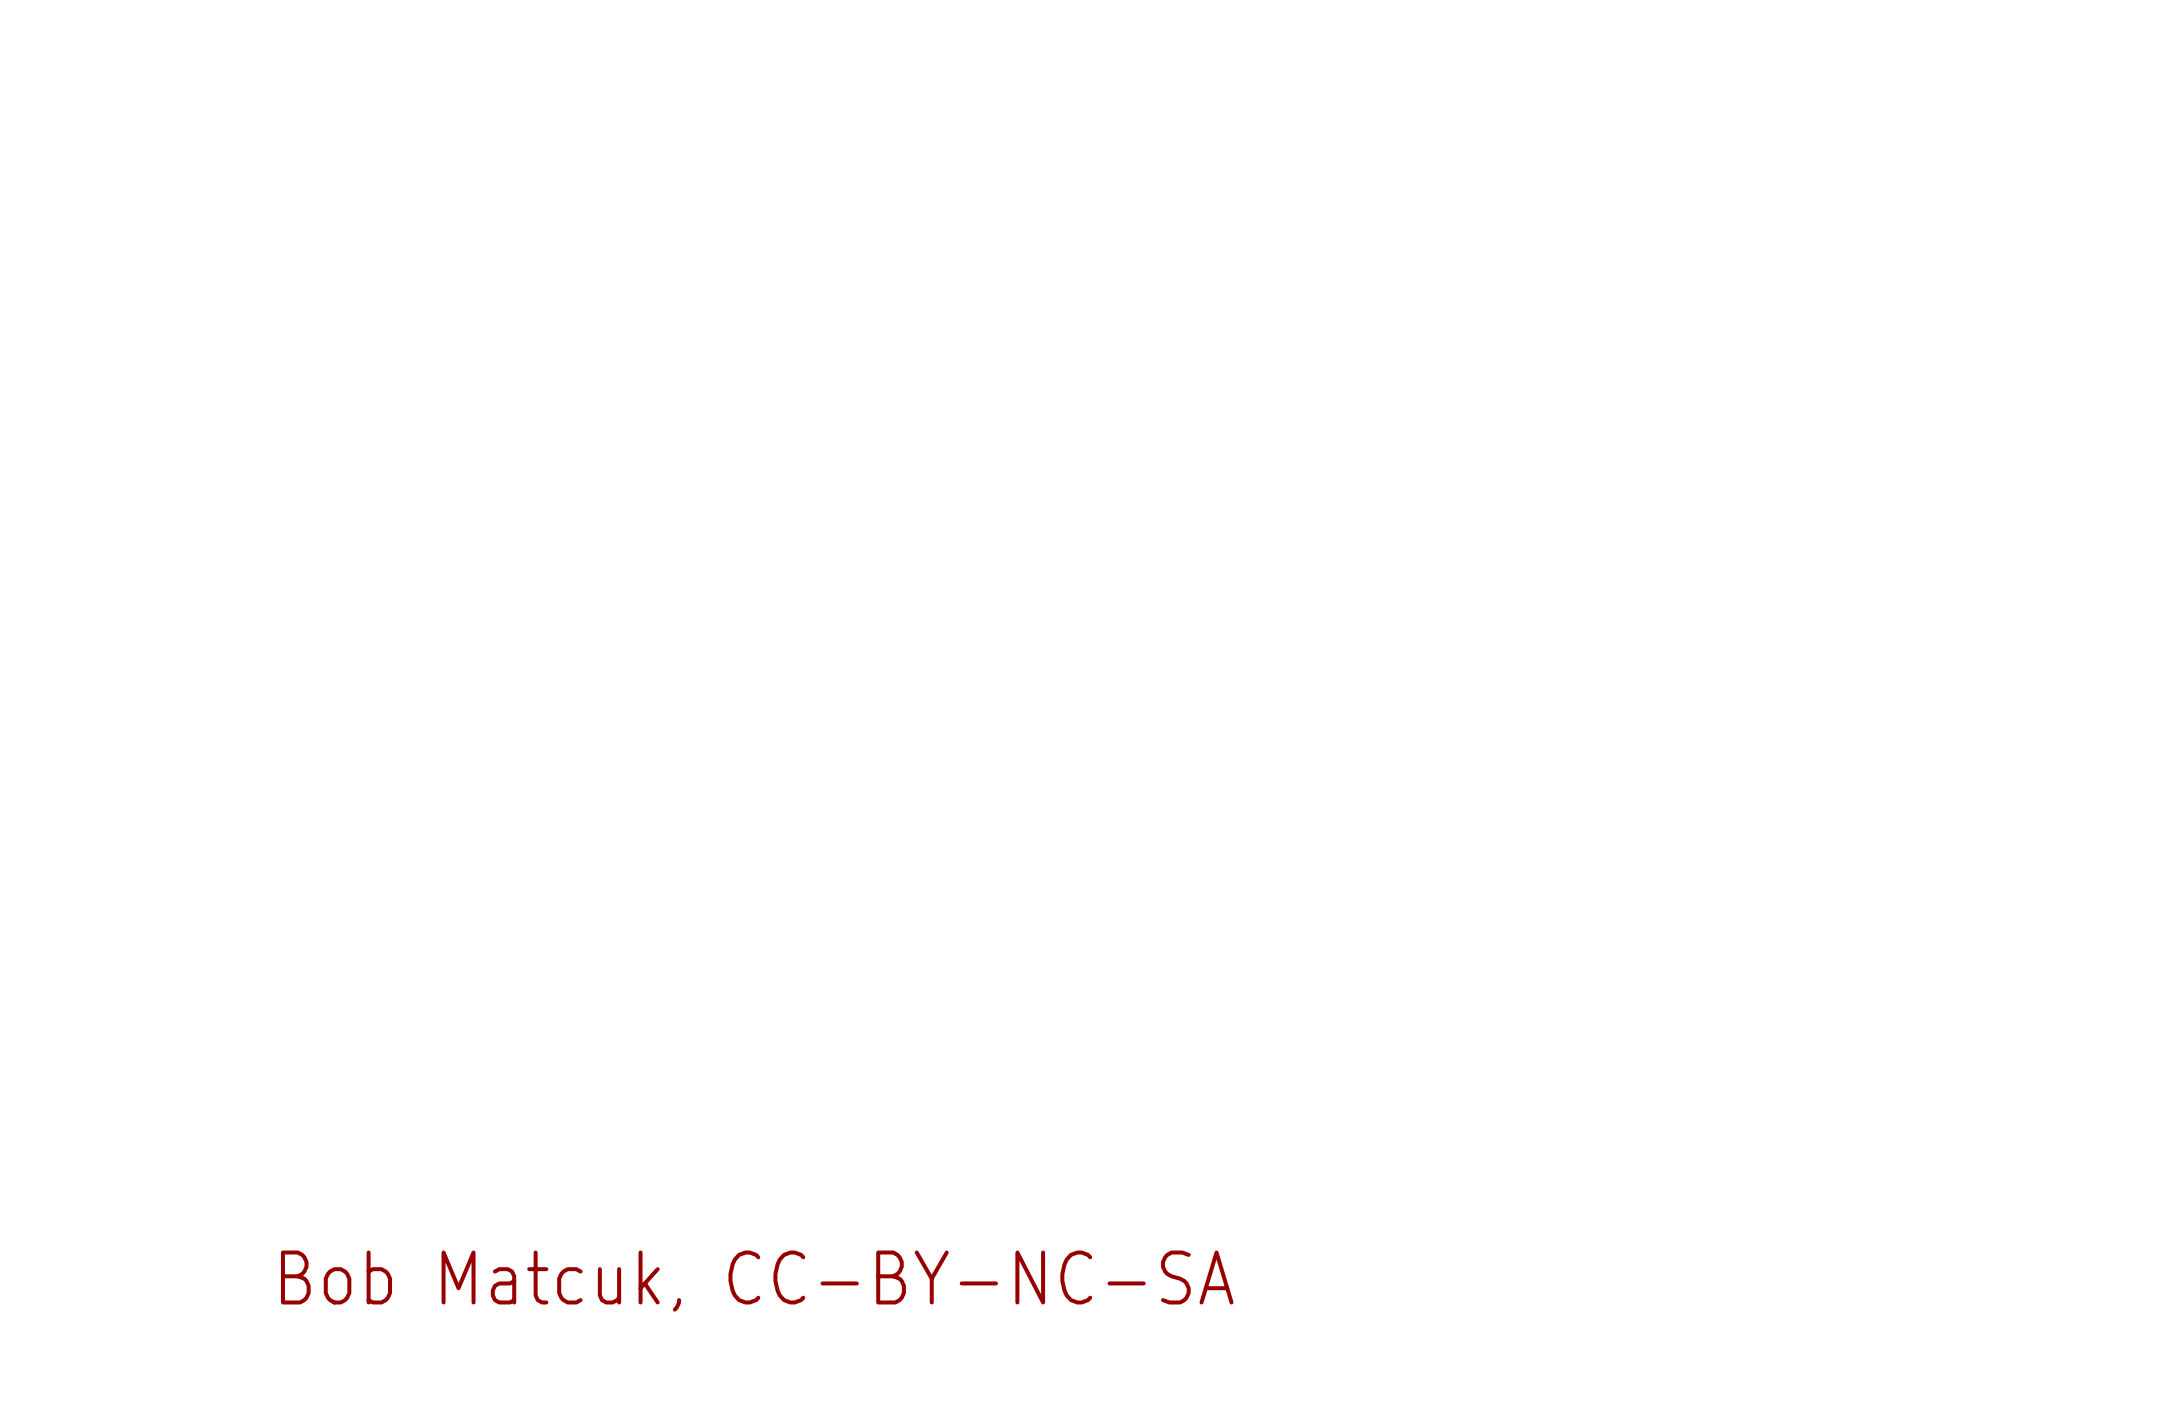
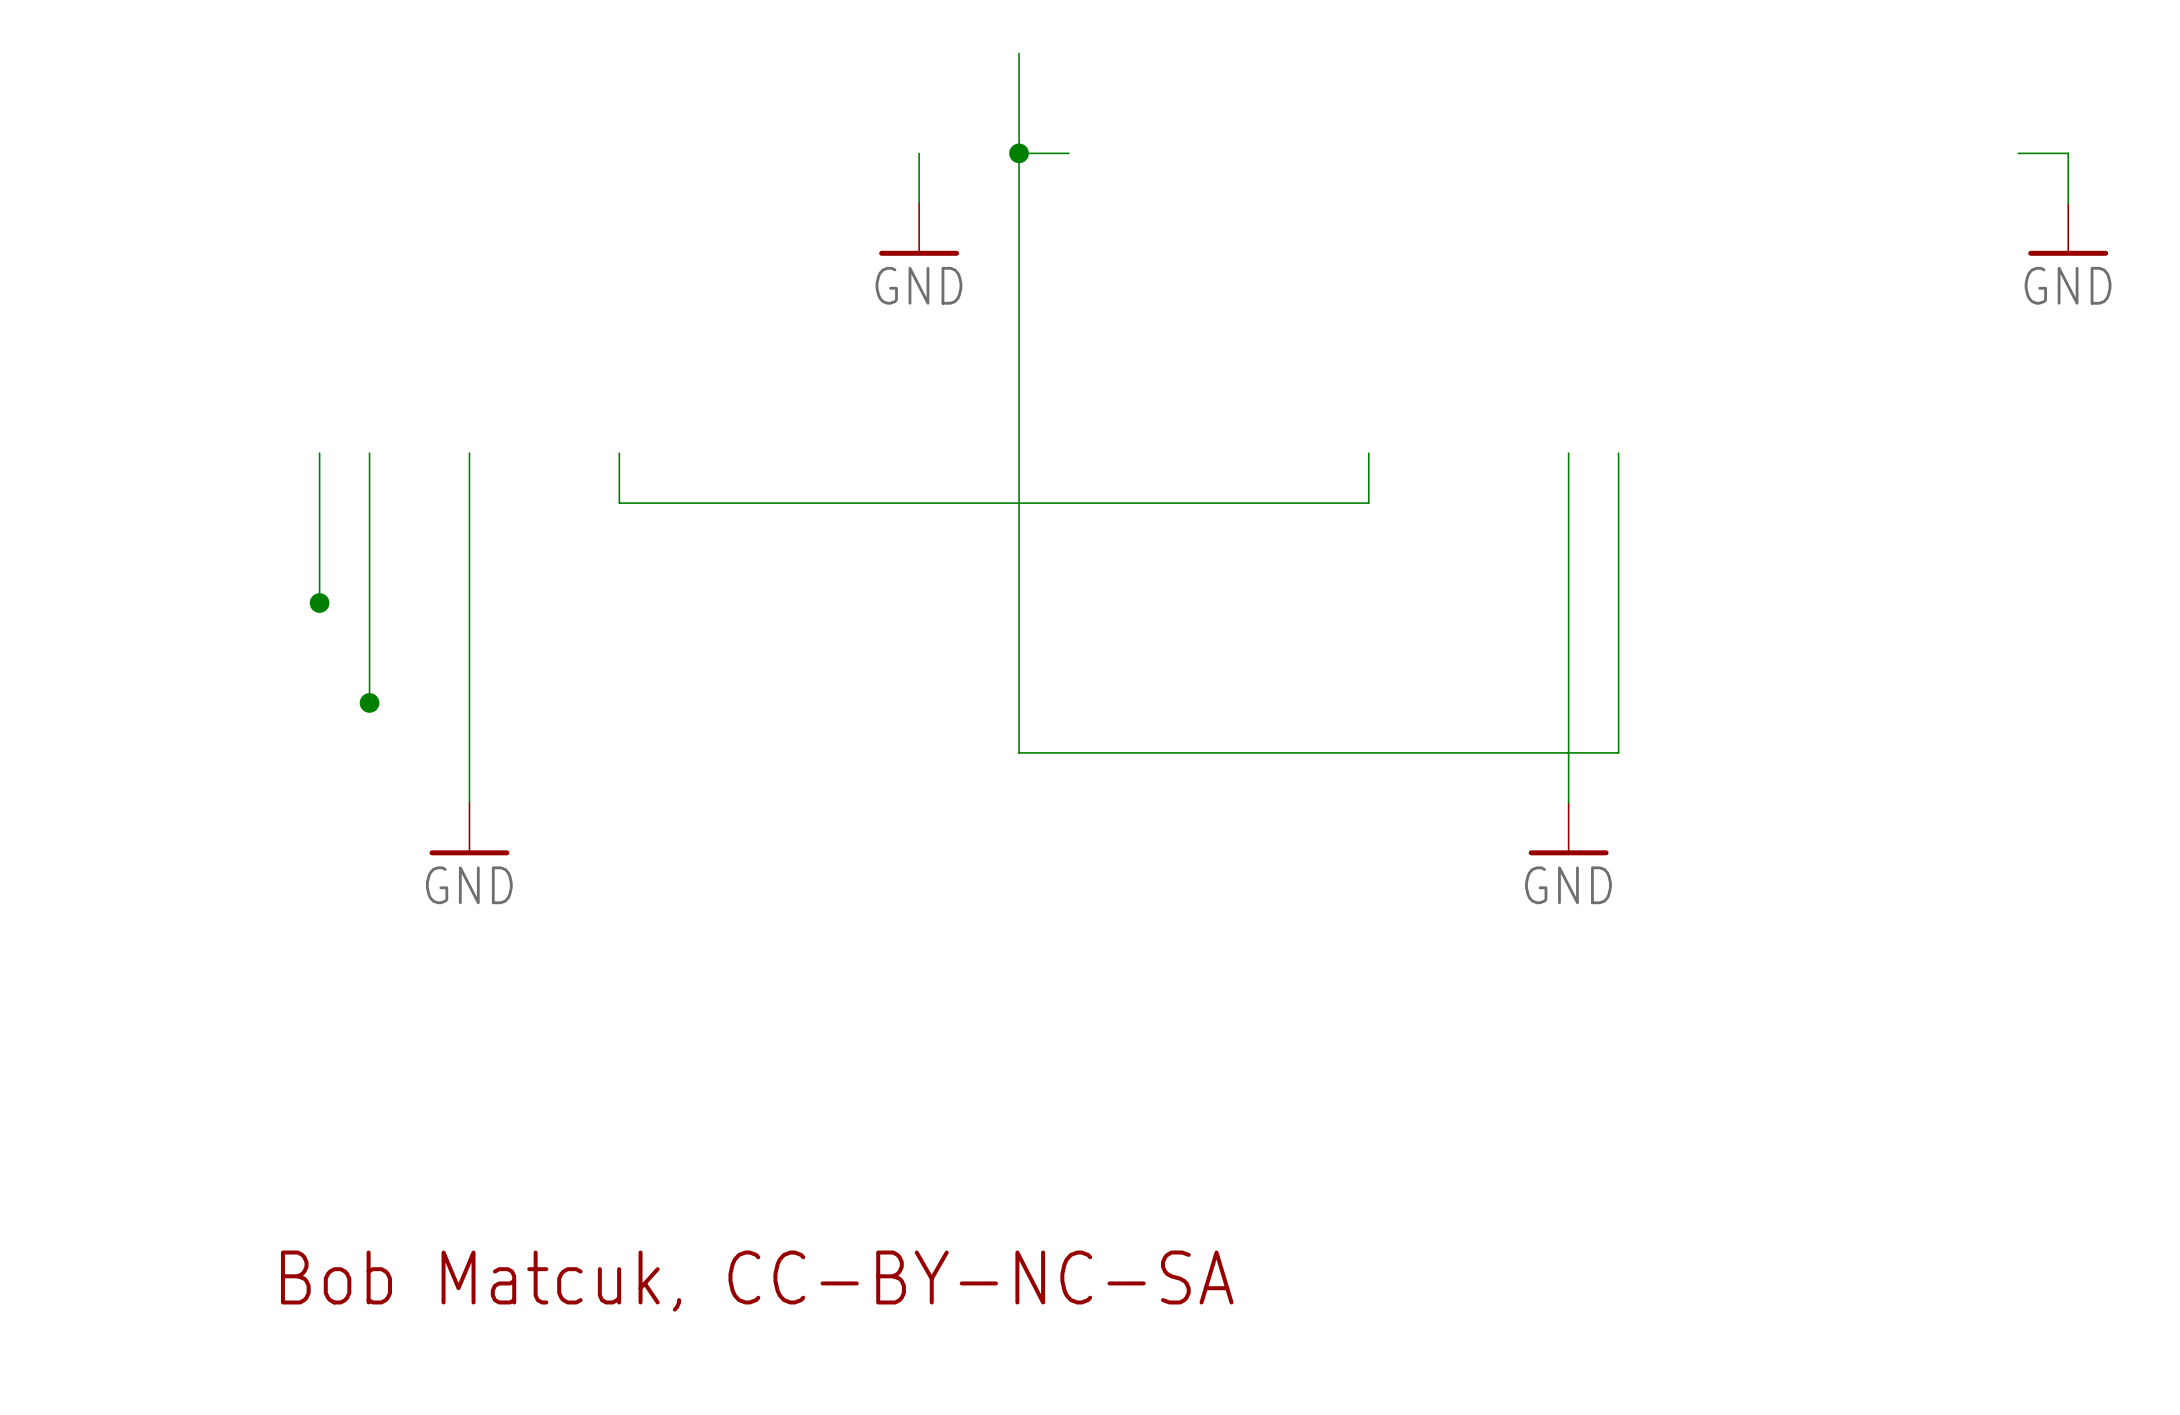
wire: none -> (1019, 53) (1019, 752) (1618, 752) (1618, 453)
wire: none -> (919, 153) (919, 203)
wire: none -> (1019, 153) (1069, 153)
junction: none -> (1019, 153)
wire: none -> (2018, 153) (2068, 153) (2068, 203)
power symbol: none -> GND (919, 229)
power symbol: none -> GND (2068, 229)
wire: none -> (319, 453) (319, 603)
wire: none -> (369, 453) (369, 702)
wire: none -> (469, 453) (469, 802)
wire: none -> (619, 453) (619, 503) (1368, 503) (1368, 453)
wire: none -> (1568, 453) (1568, 802)
junction: none -> (319, 603)
junction: none -> (369, 702)
power symbol: none -> GND (469, 829)
power symbol: none -> GND (1568, 829)

